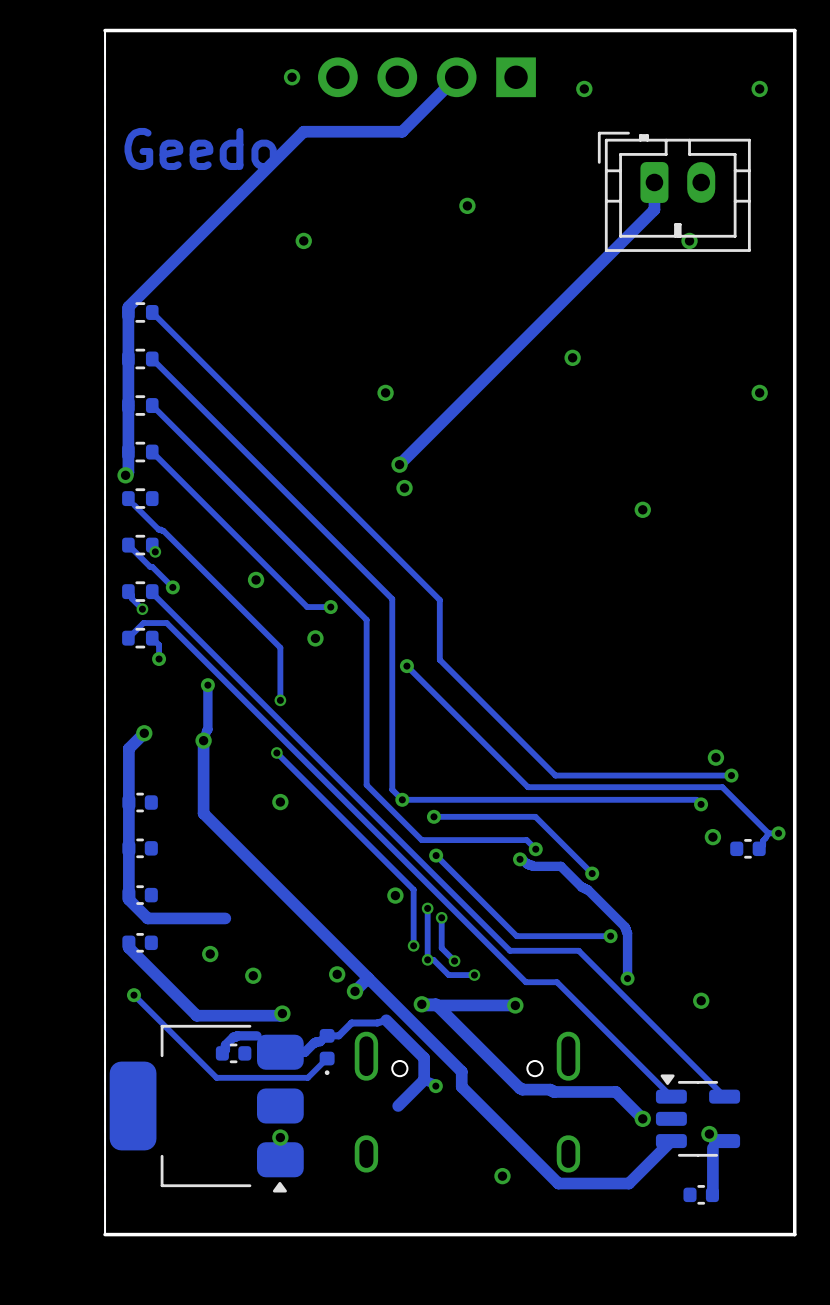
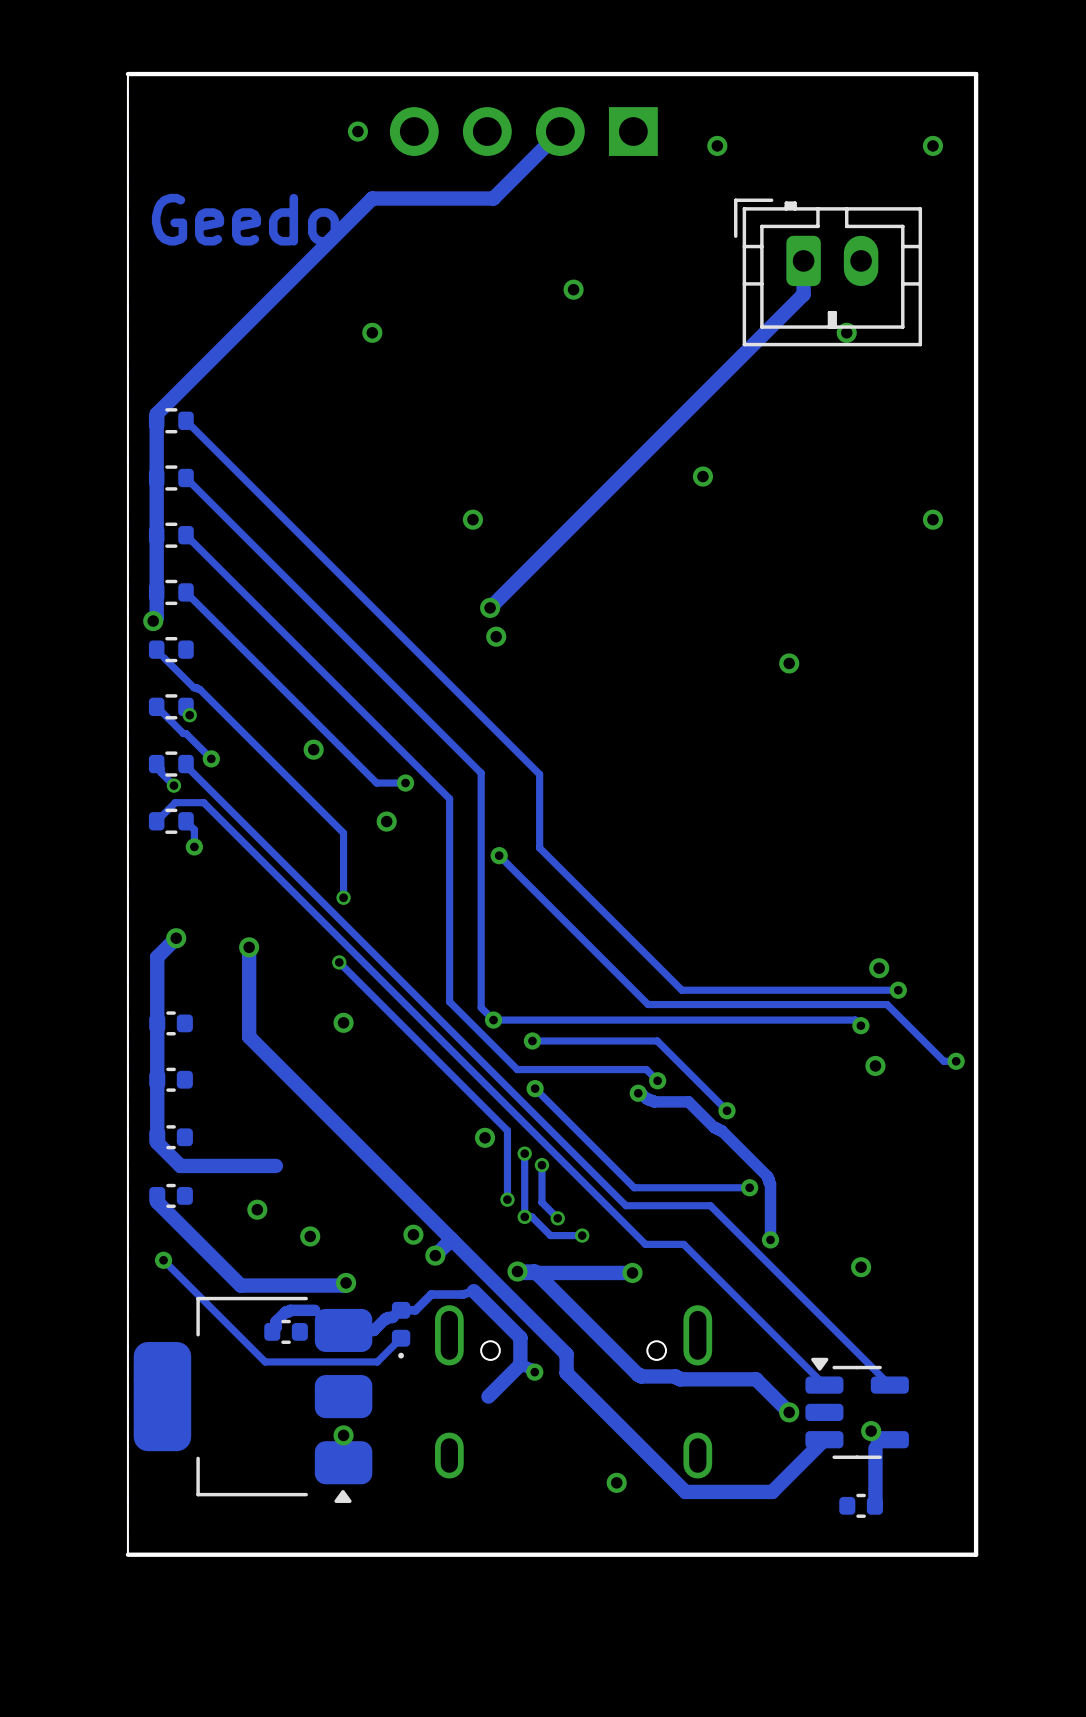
track: (207, 685) (207, 729) (203, 740) -> none
via: (207, 685) -> none
track: (768, 833) (759, 848) -> none
part: (747, 848) -> none

